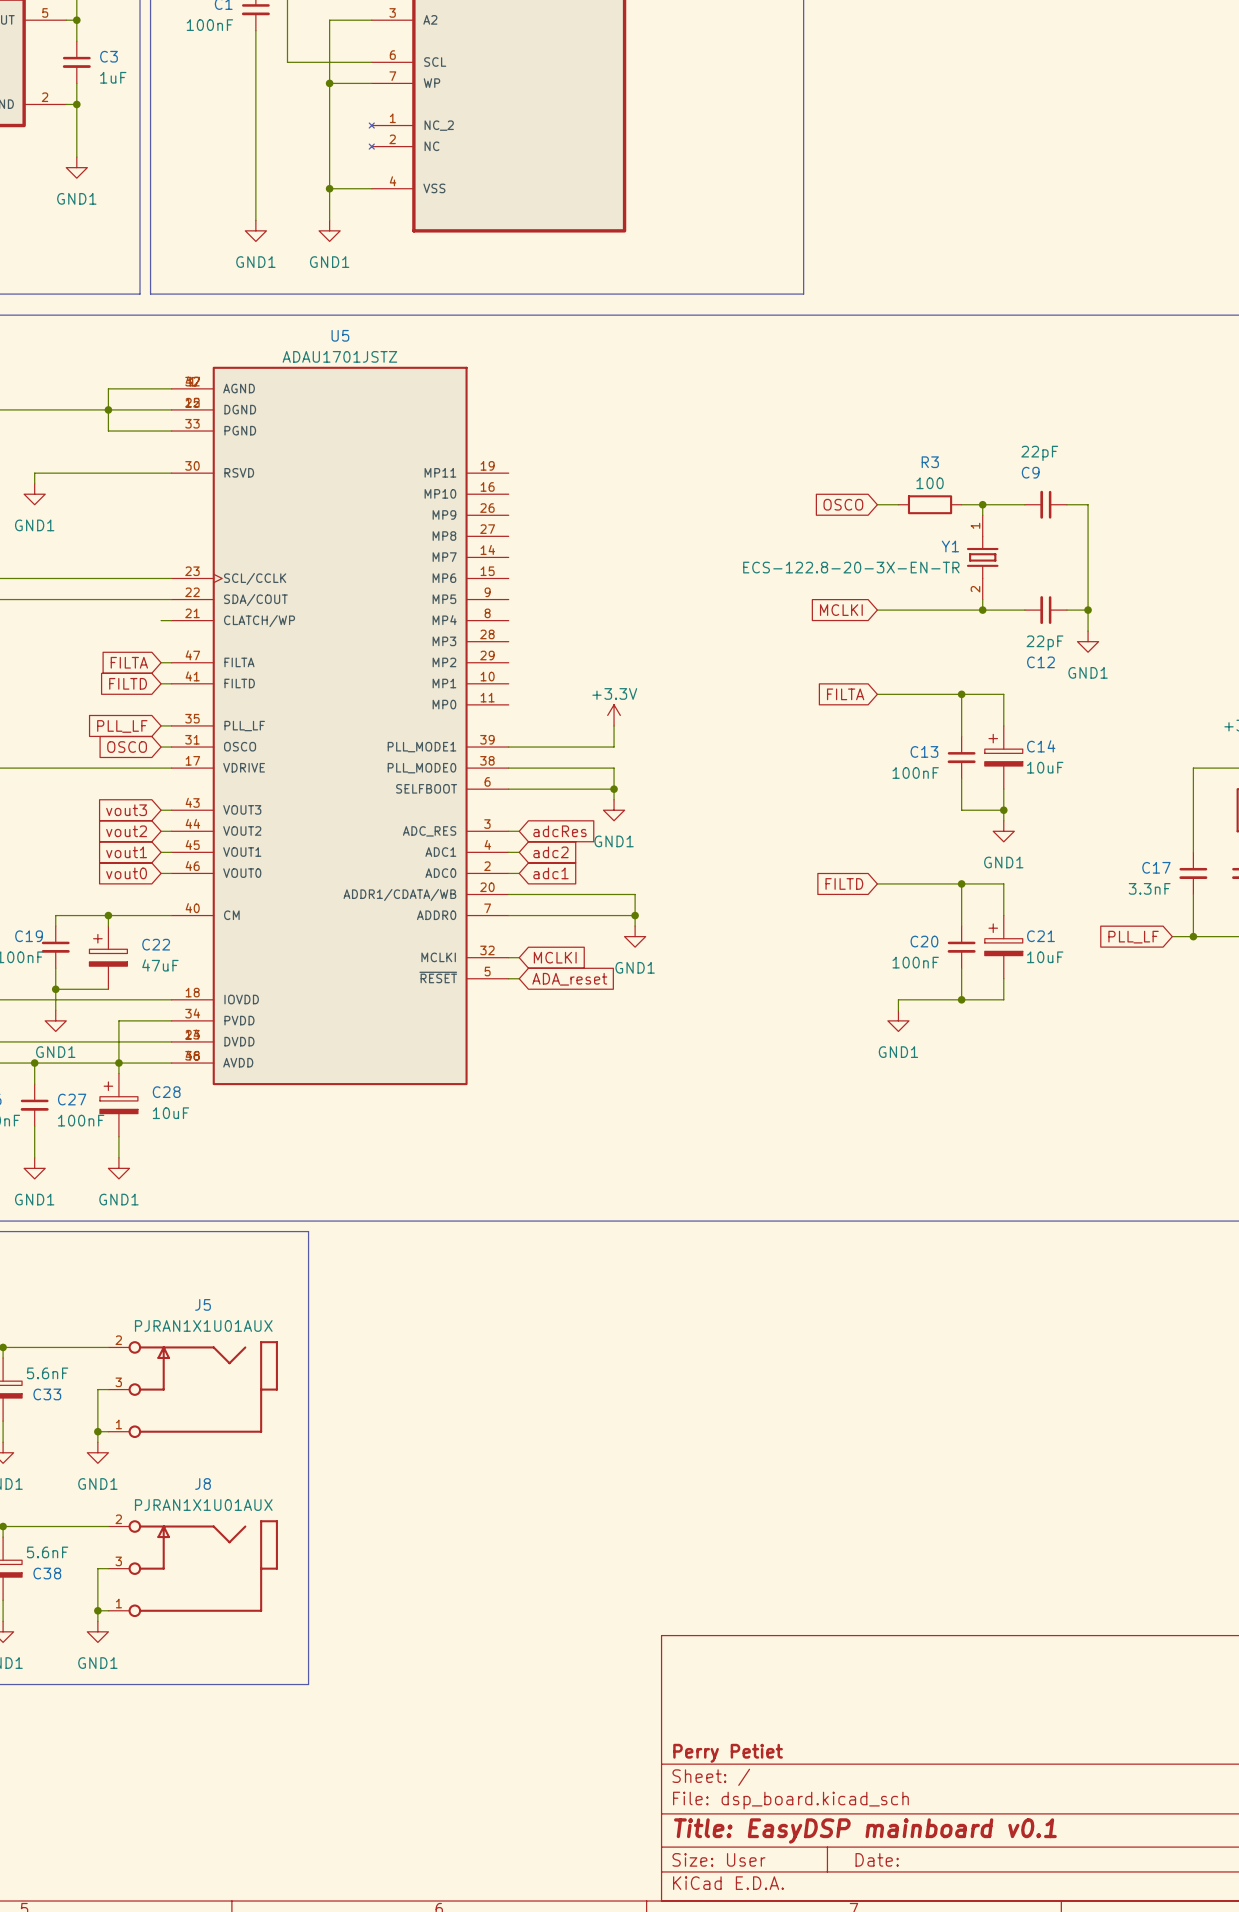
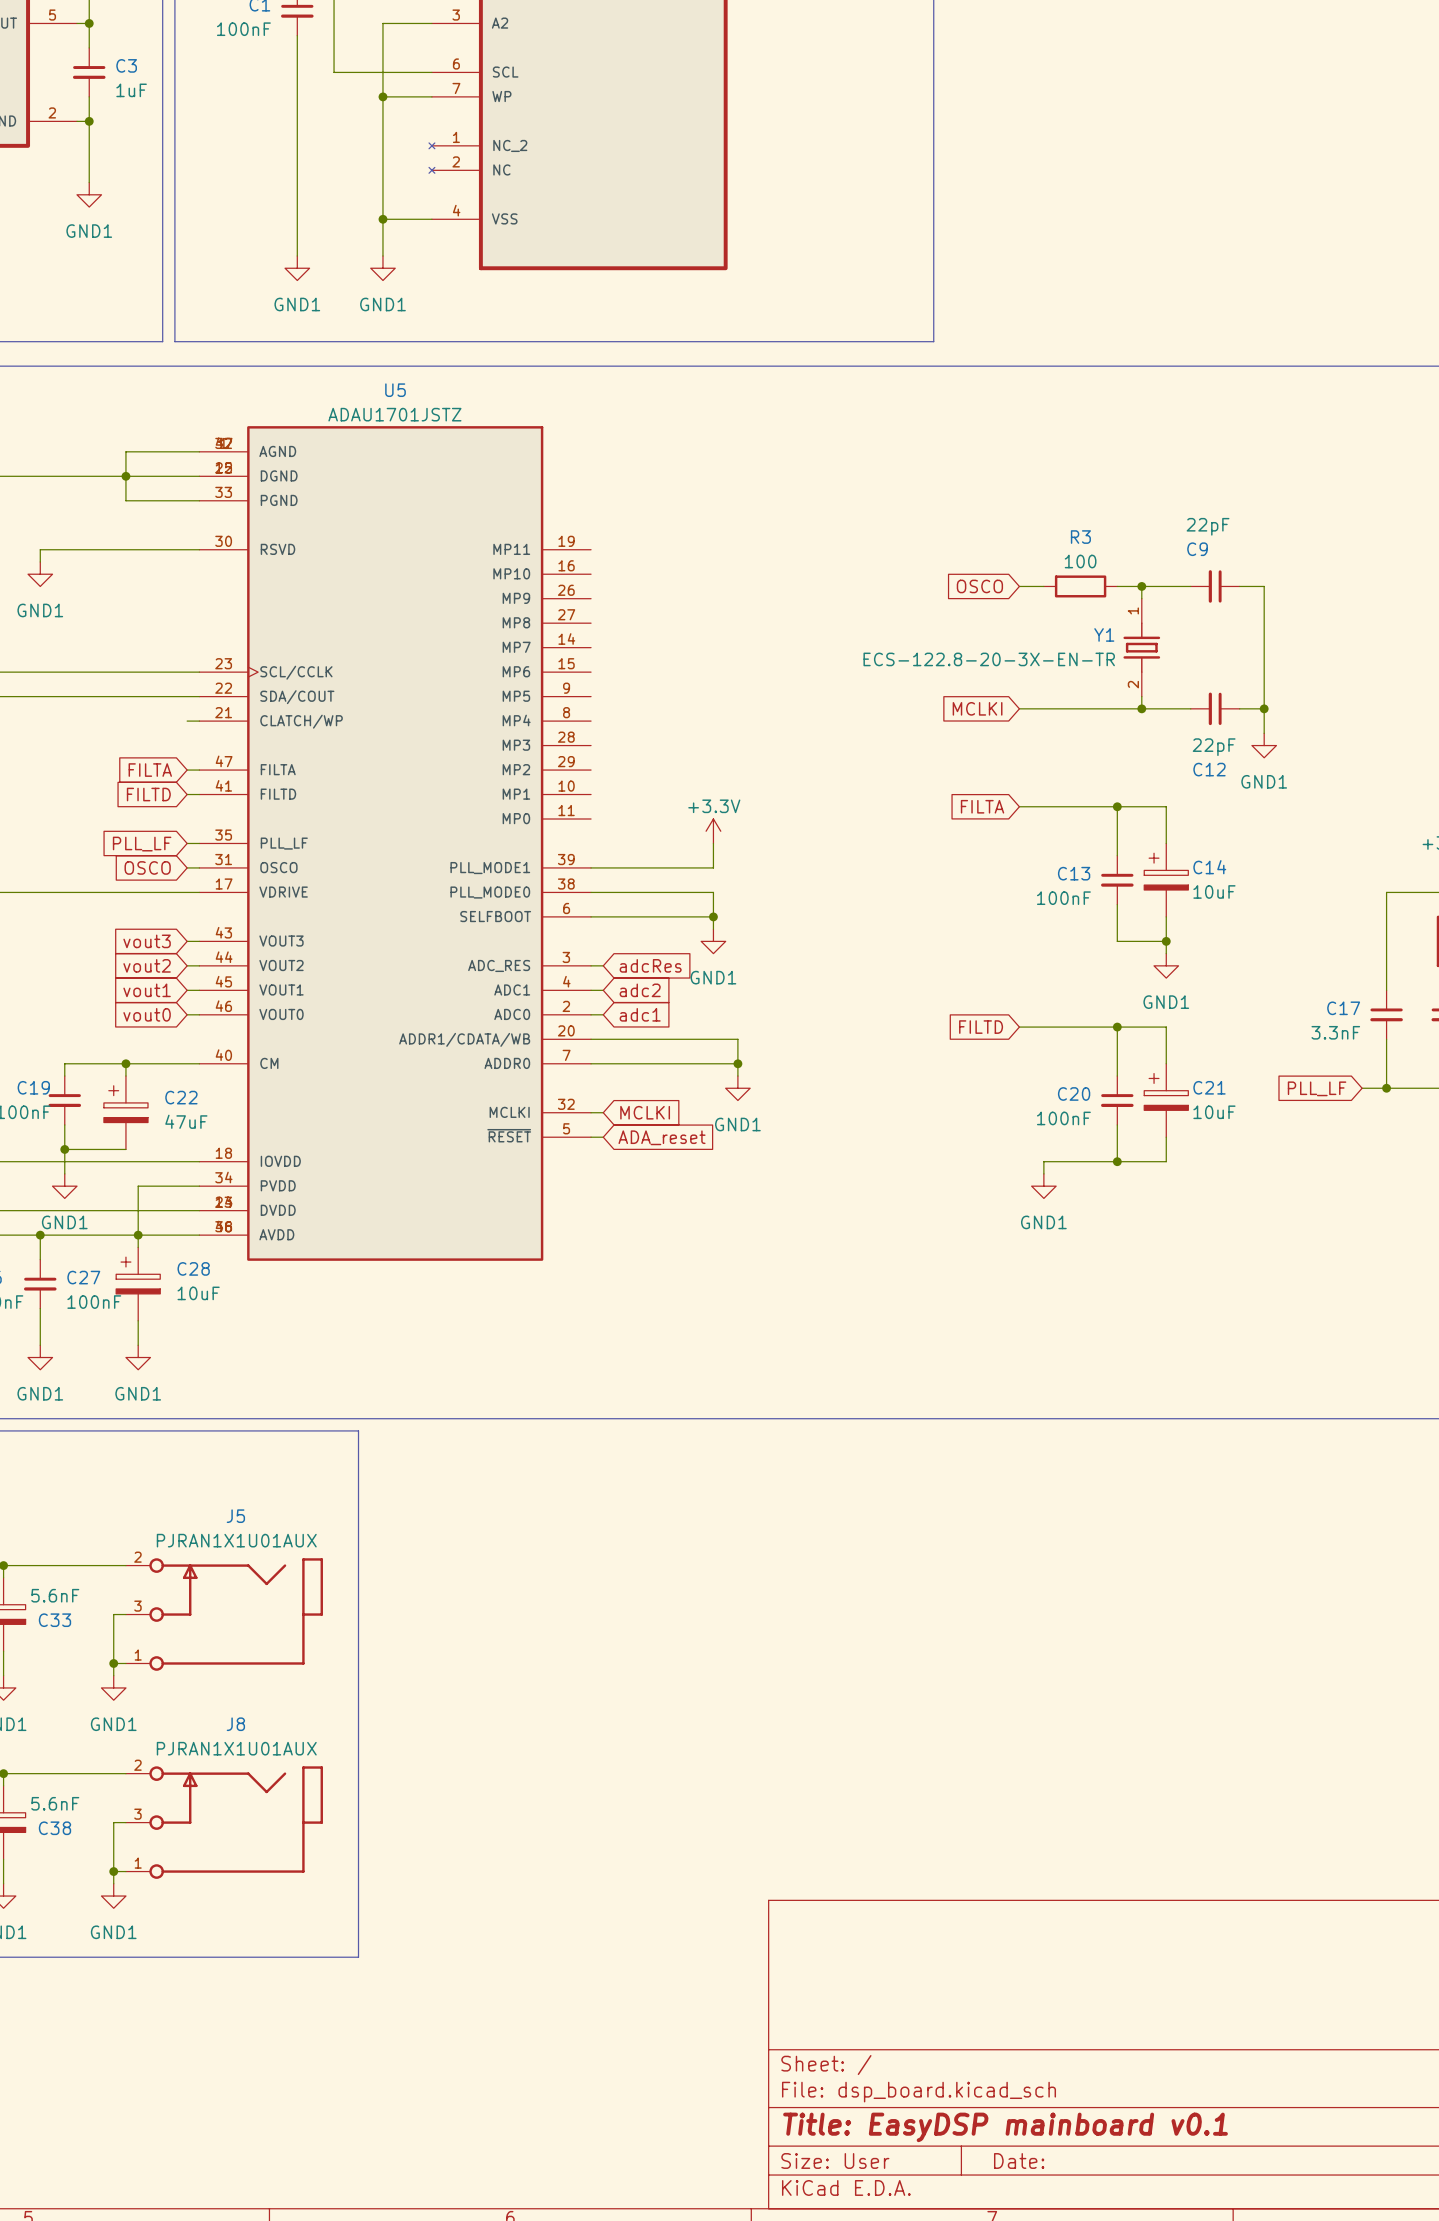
title block: Perry Petiet (728, 1753) -> none

